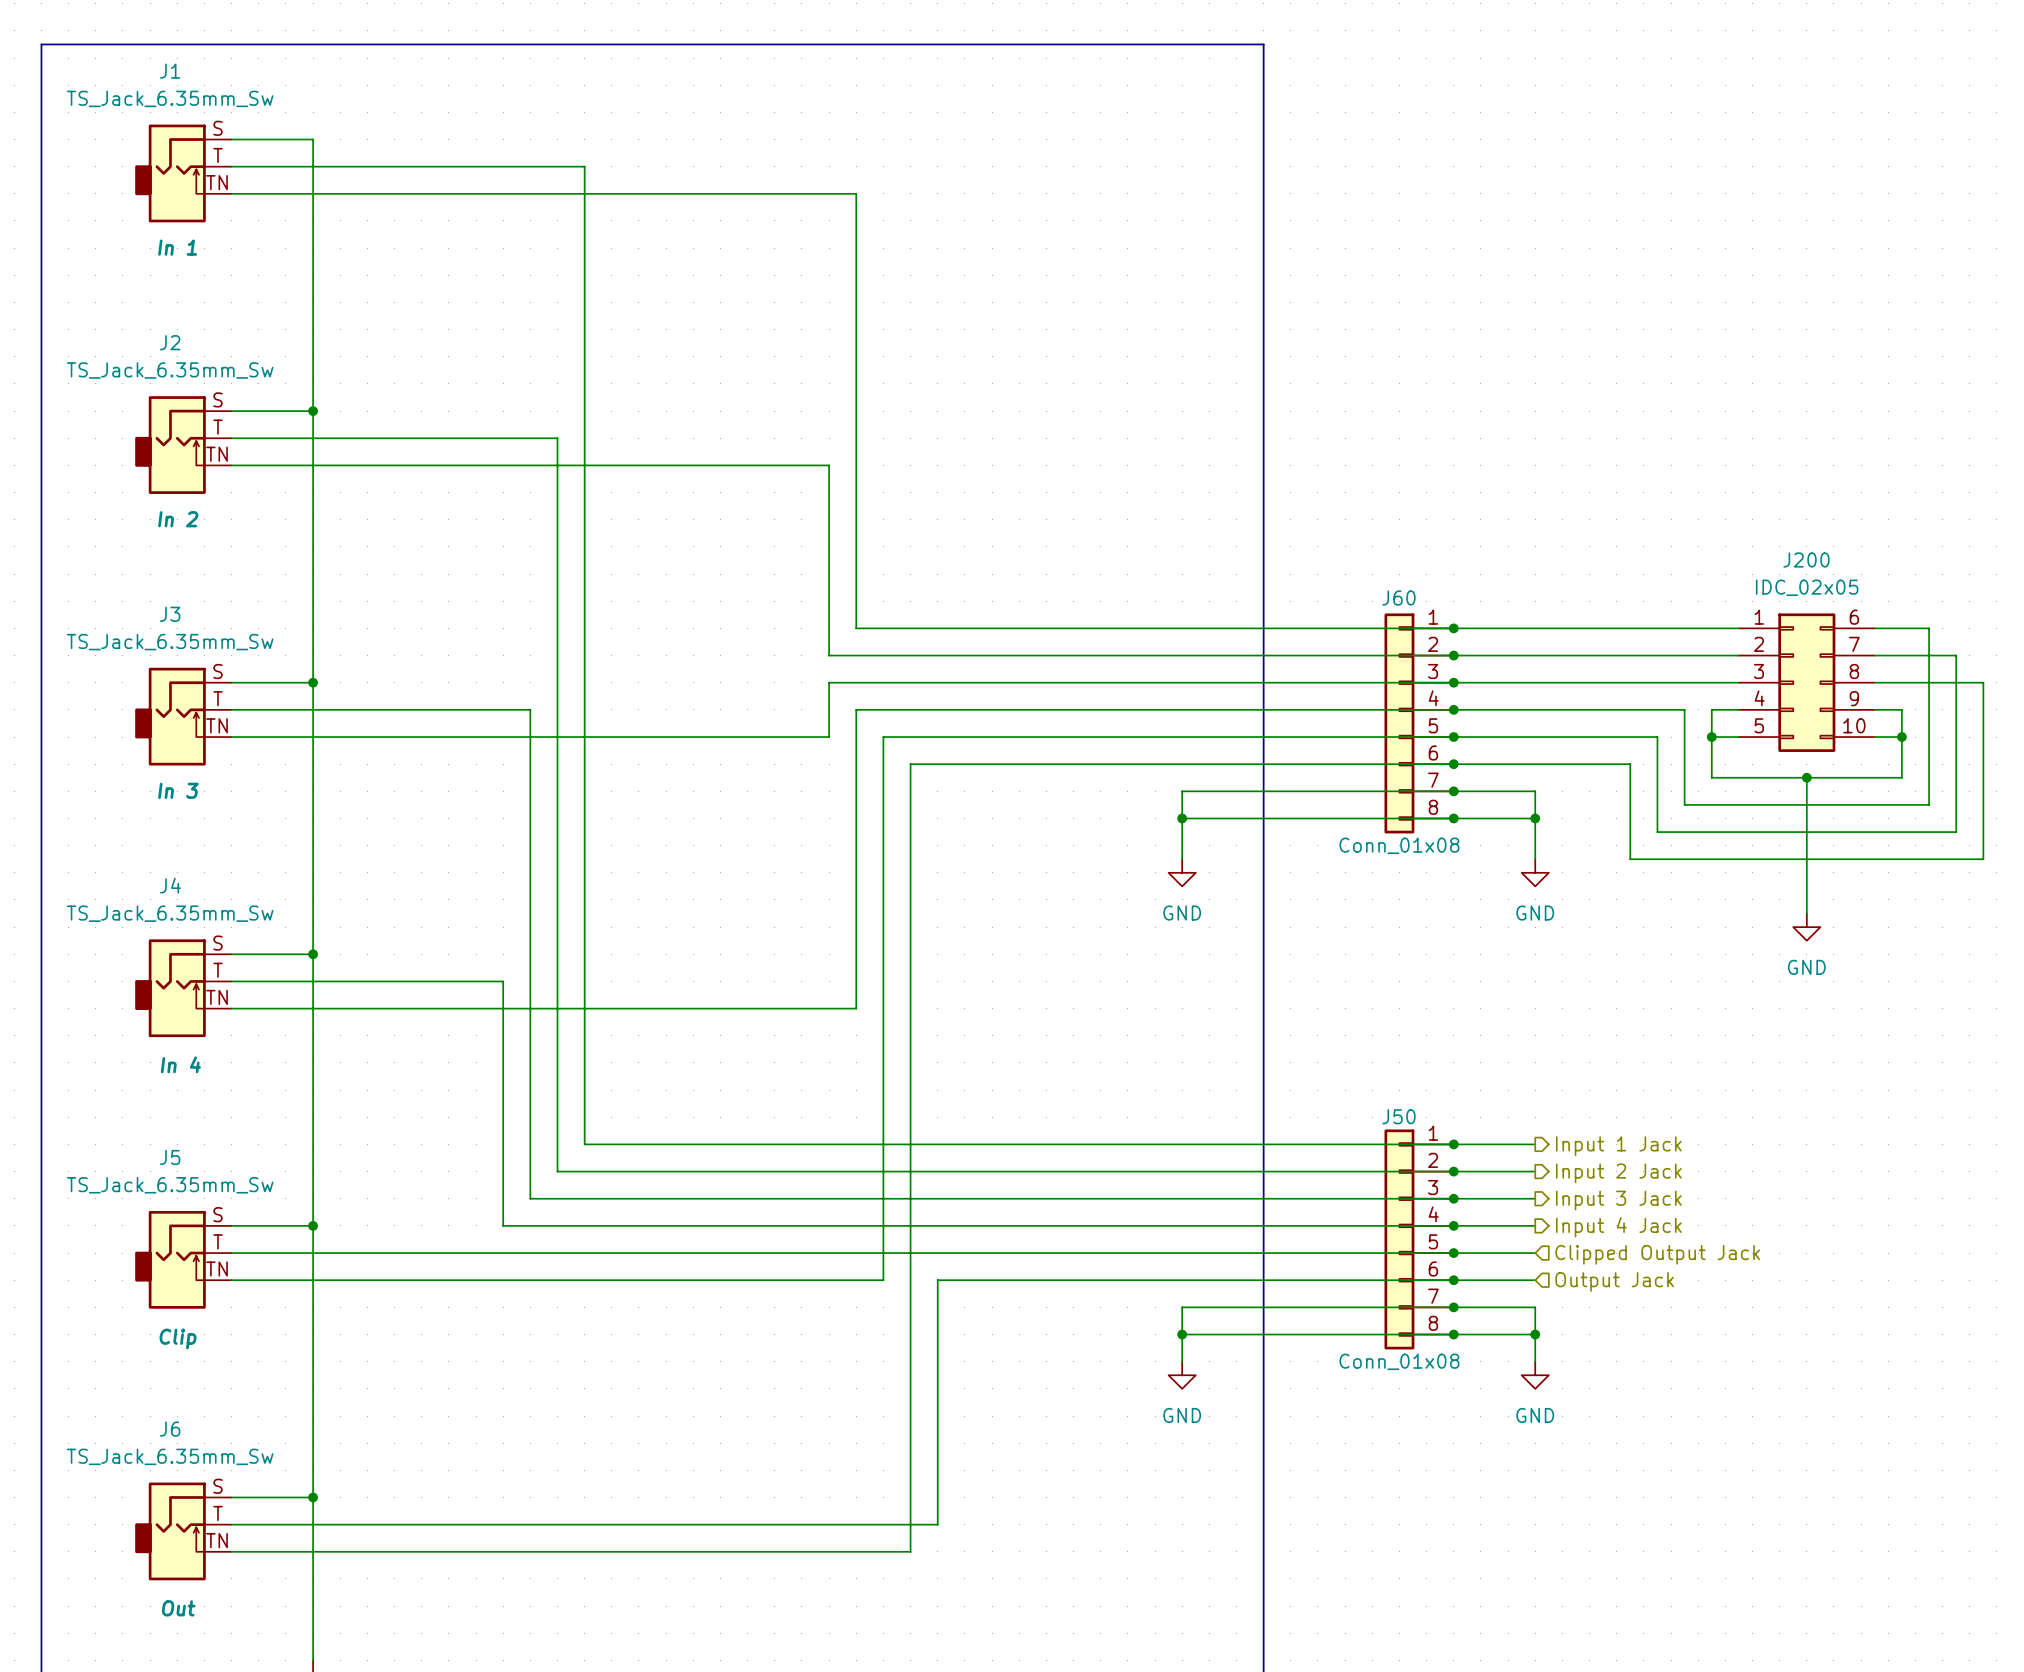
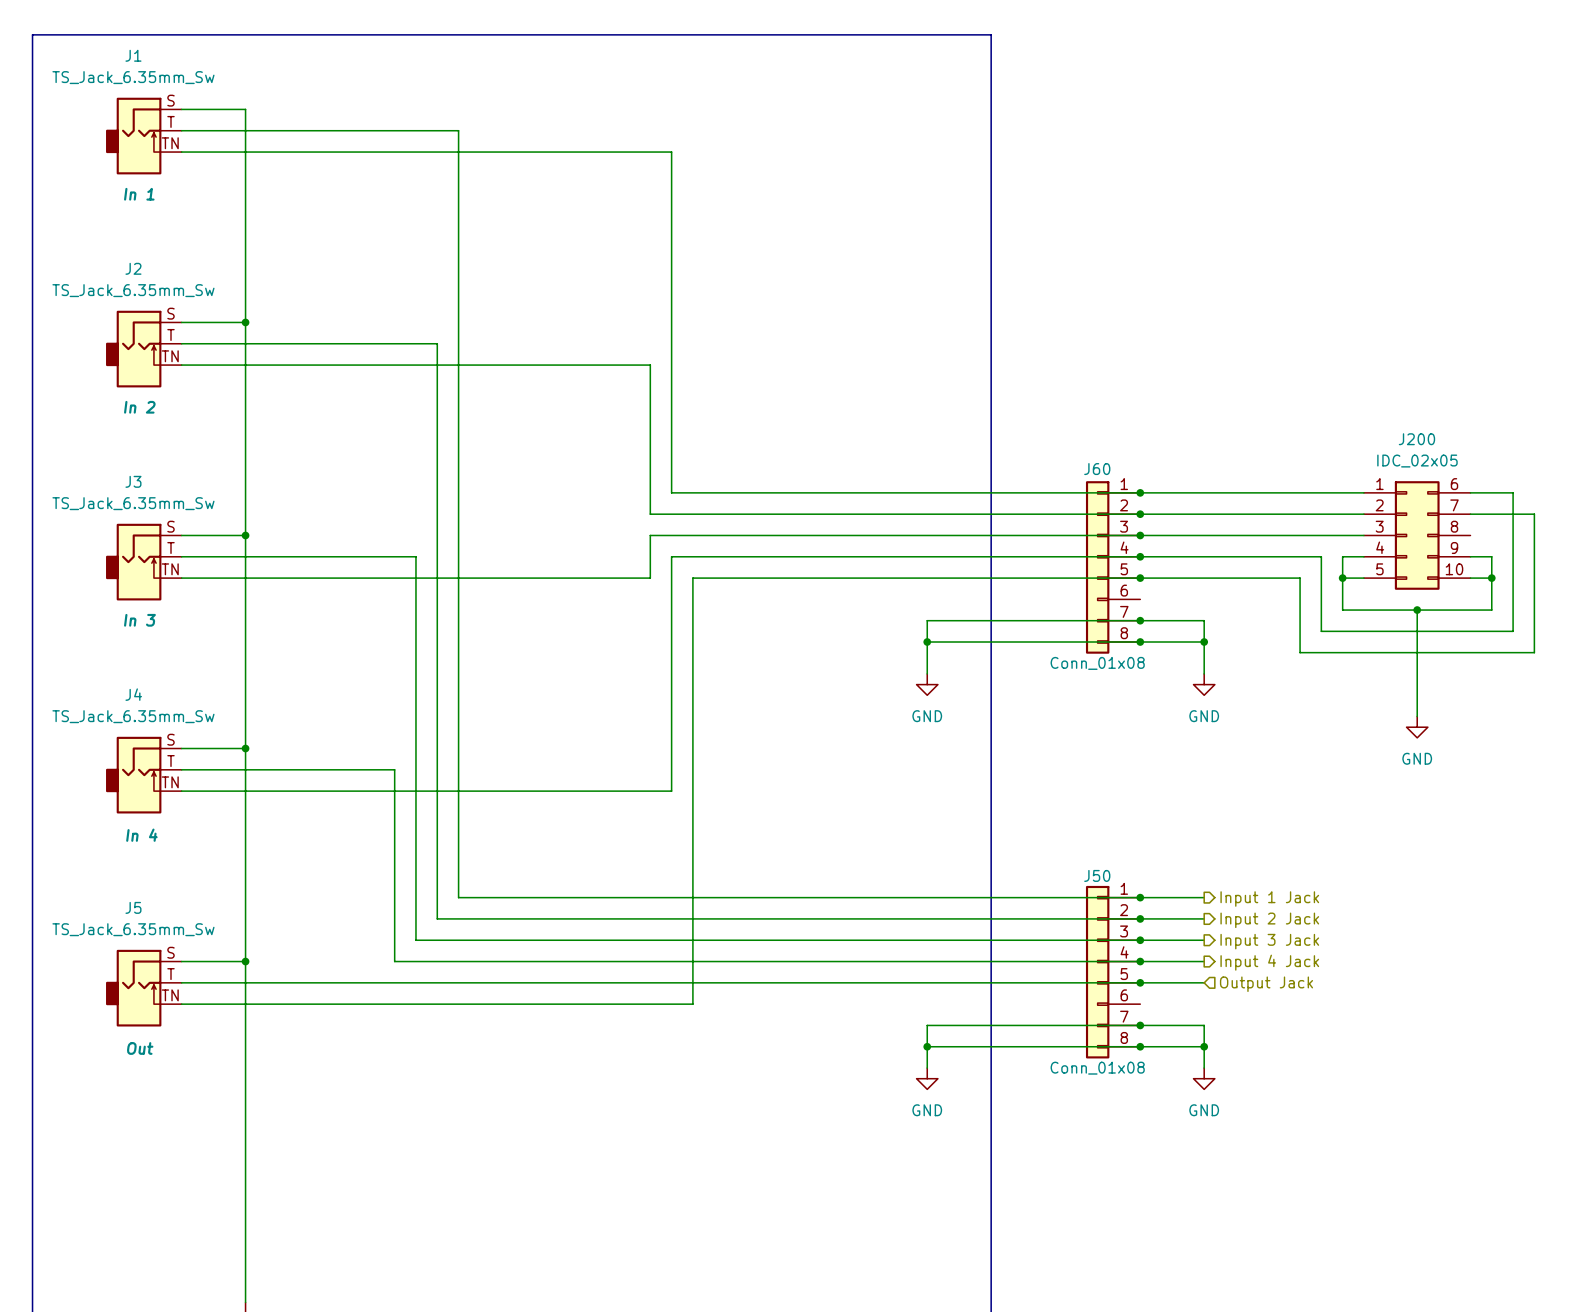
wire: (1874, 682) (1983, 682) (1983, 859) (1630, 859) (1630, 764) (910, 764) (910, 1551) (231, 1551) -> none
junction: (1453, 764) -> none
hierarchical label: Clipped Output Jack (1657, 1254) -> Output Jack (1266, 984)
junction: (1453, 1280) -> none
wire: (1535, 1280) (937, 1280) (937, 1524) (231, 1524) -> none
hierarchical label: Output Jack (1614, 1281) -> none
J5 text: Clip (178, 1339) -> Out (140, 1048)
wire: (231, 1497) (313, 1497) -> none
junction: (313, 1497) -> none
J6: TS_Jack_6.35mm_Sw (183, 1531) -> none

